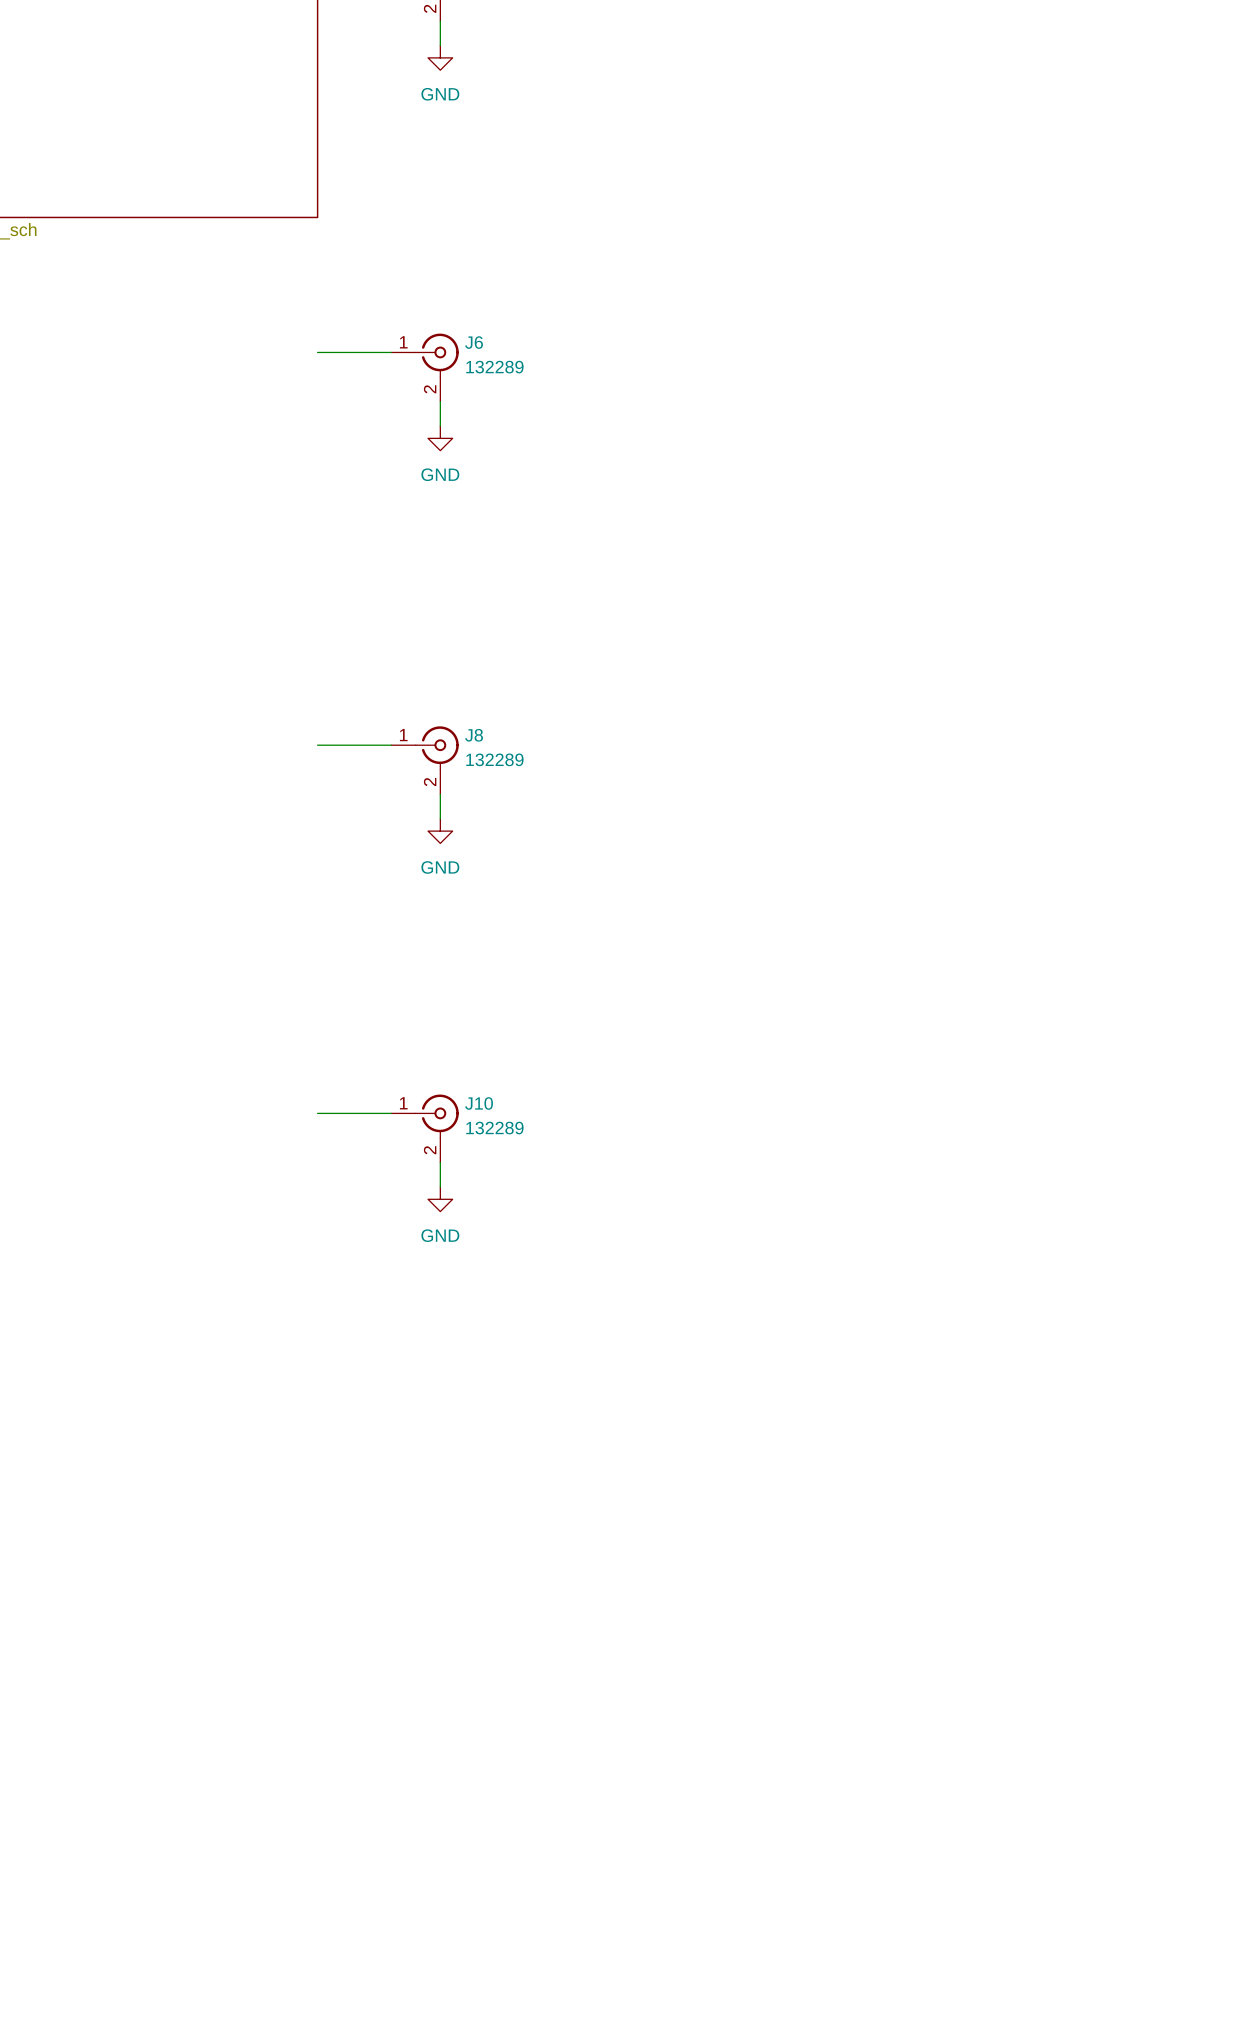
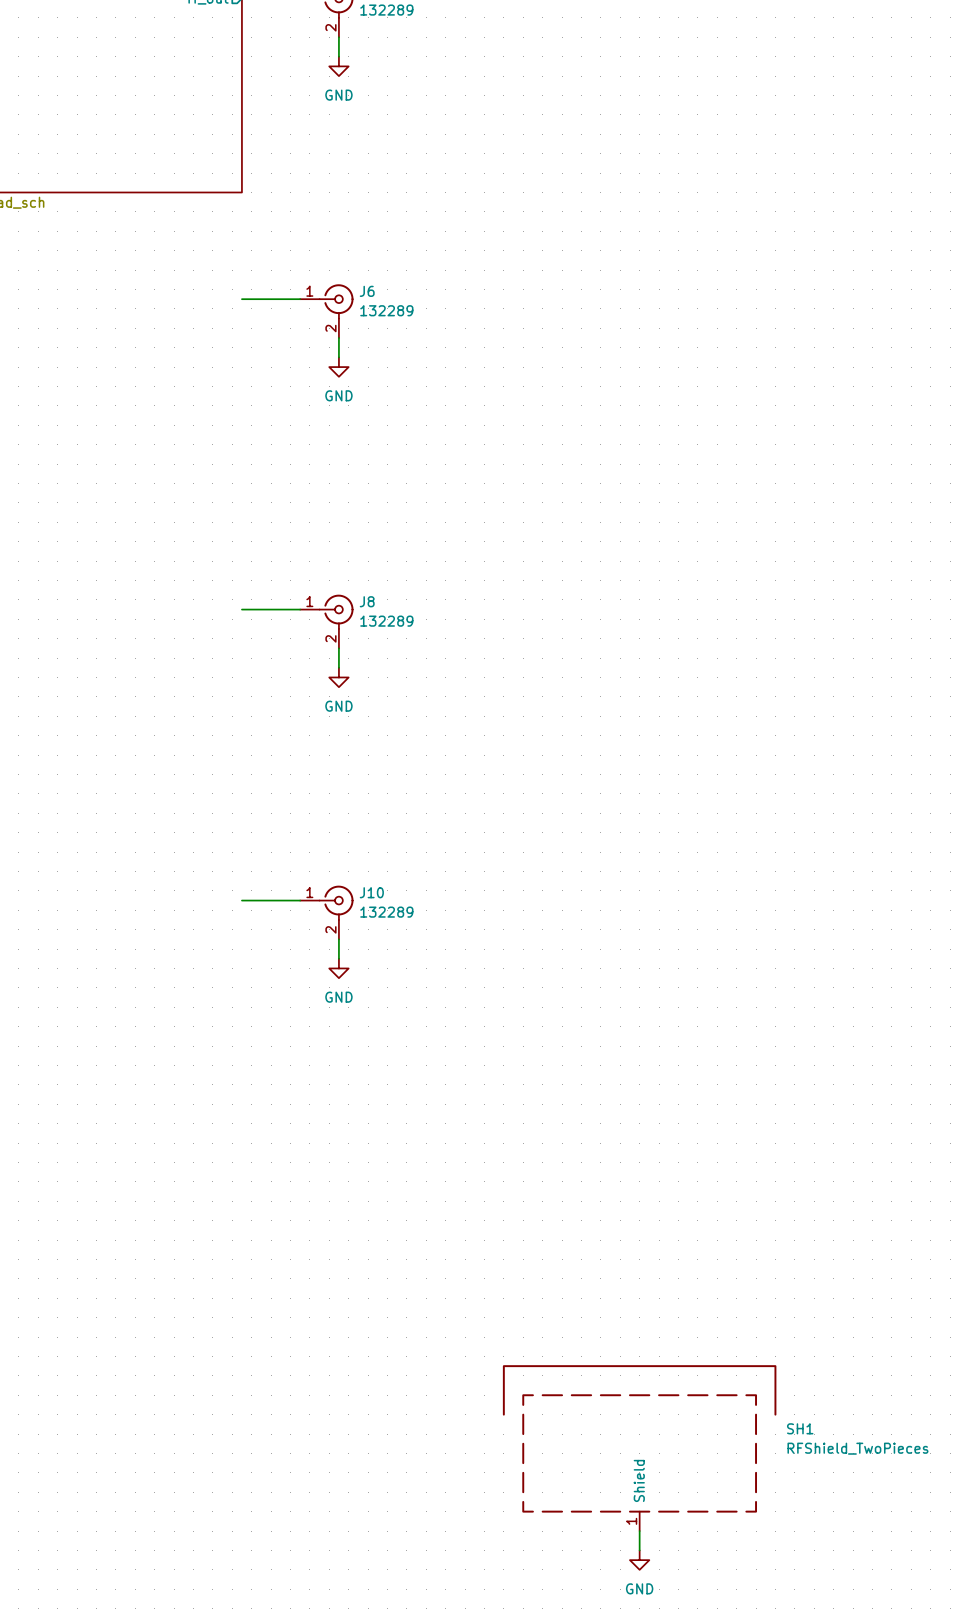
SH1: none -> RFShield_TwoPieces (639, 1448)
wire: none -> (639, 1531) (639, 1550)
power symbol: none -> GND (639, 1560)

